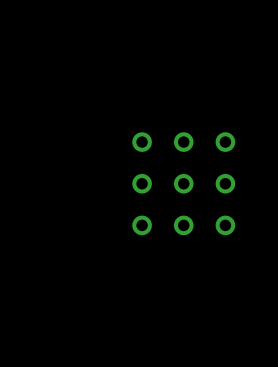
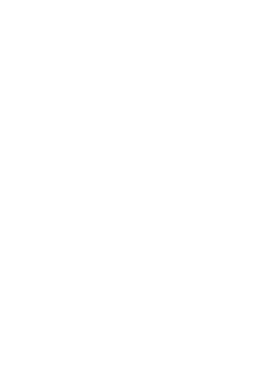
part: (183, 183) -> none

